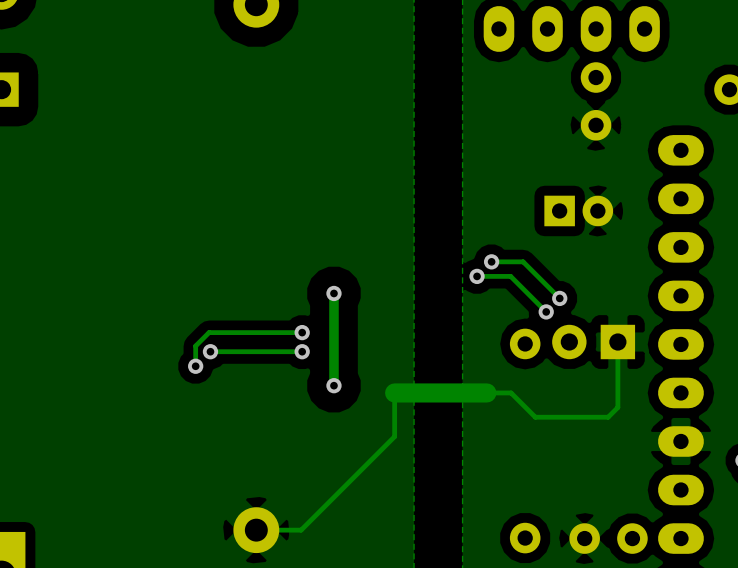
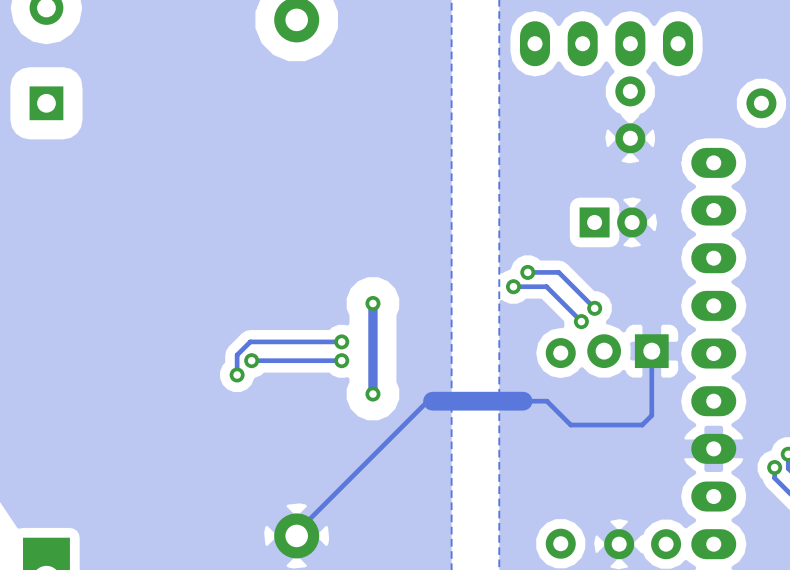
track: (394, 392) (394, 436) (301, 530) (256, 530) -> (432, 401) (427, 401) (296, 532) (296, 535)

